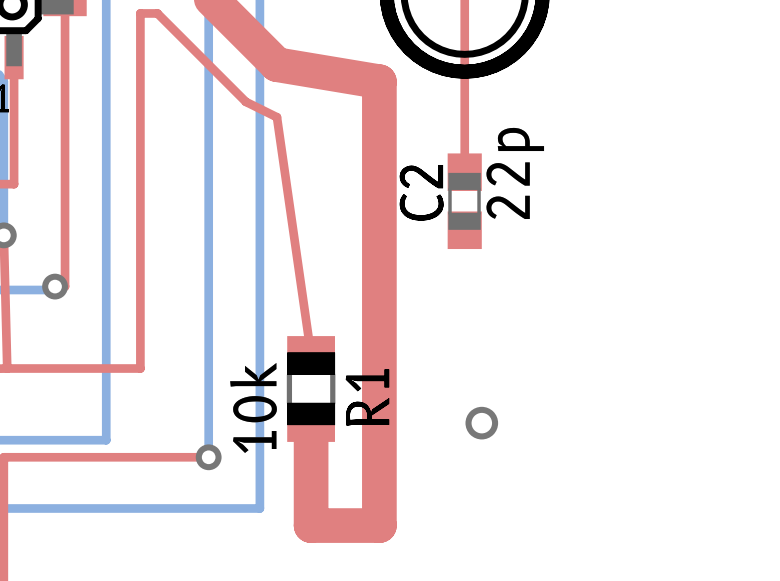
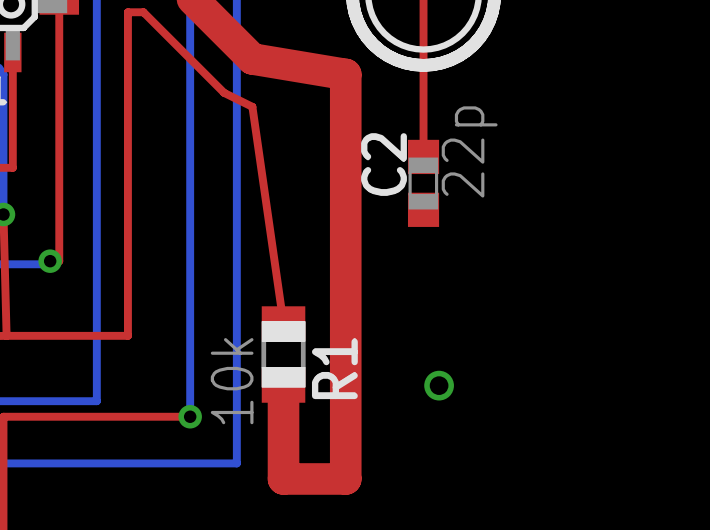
text: 22p (515, 173) -> none
text: 10k (253, 407) -> none

